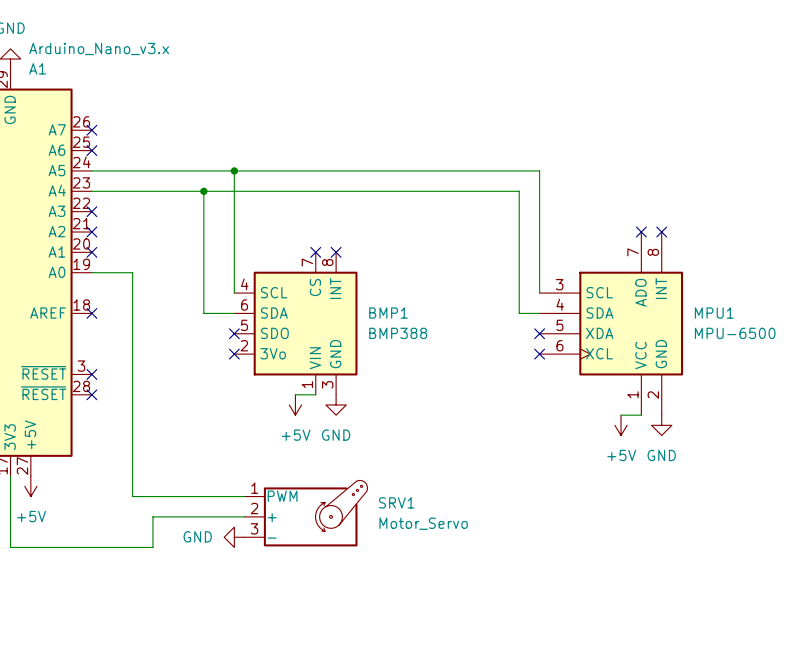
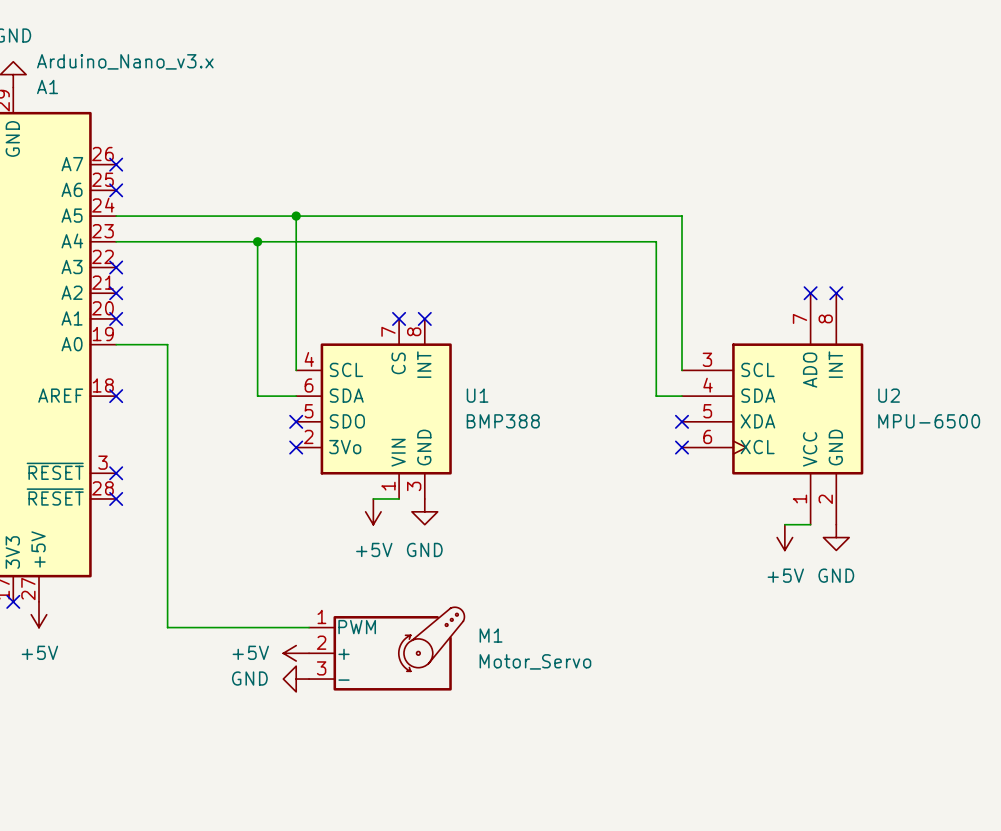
BMP1 name: BMP1 (388, 313) -> U1 (477, 395)
MPU1 name: MPU1 (714, 313) -> U2 (889, 395)
wire: (10, 476) (10, 547) (152, 547) (152, 516) (244, 516) -> none
no-connect mark: none -> (13, 601)
SRV1 name: SRV1 (396, 502) -> M1 (491, 635)
power symbol: none -> +5V (296, 653)

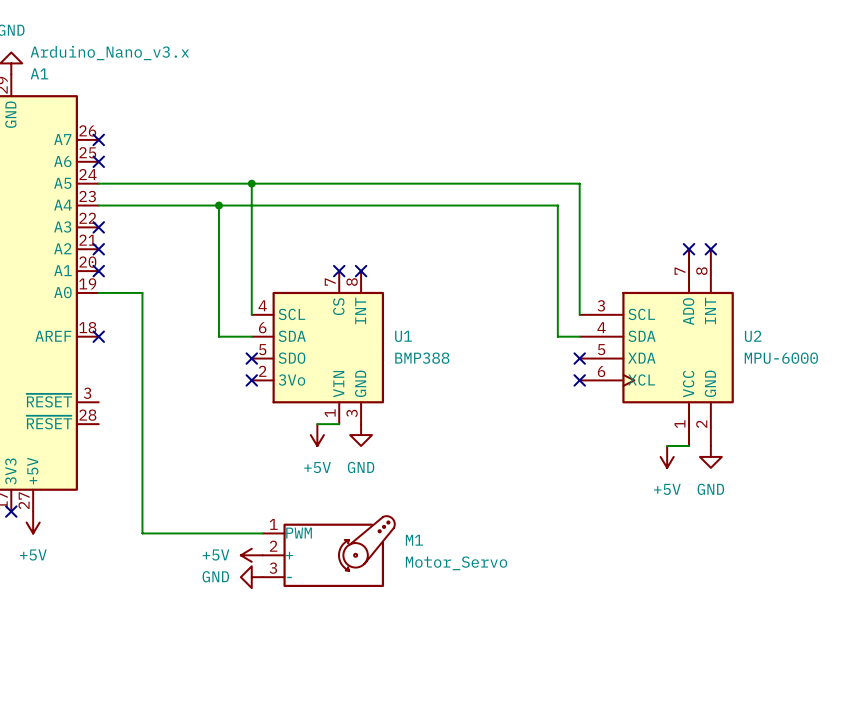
U2 value: MPU-6500 (929, 421) -> MPU-6000 (781, 358)
no-connect mark: (116, 473) -> none
no-connect mark: (116, 498) -> none

